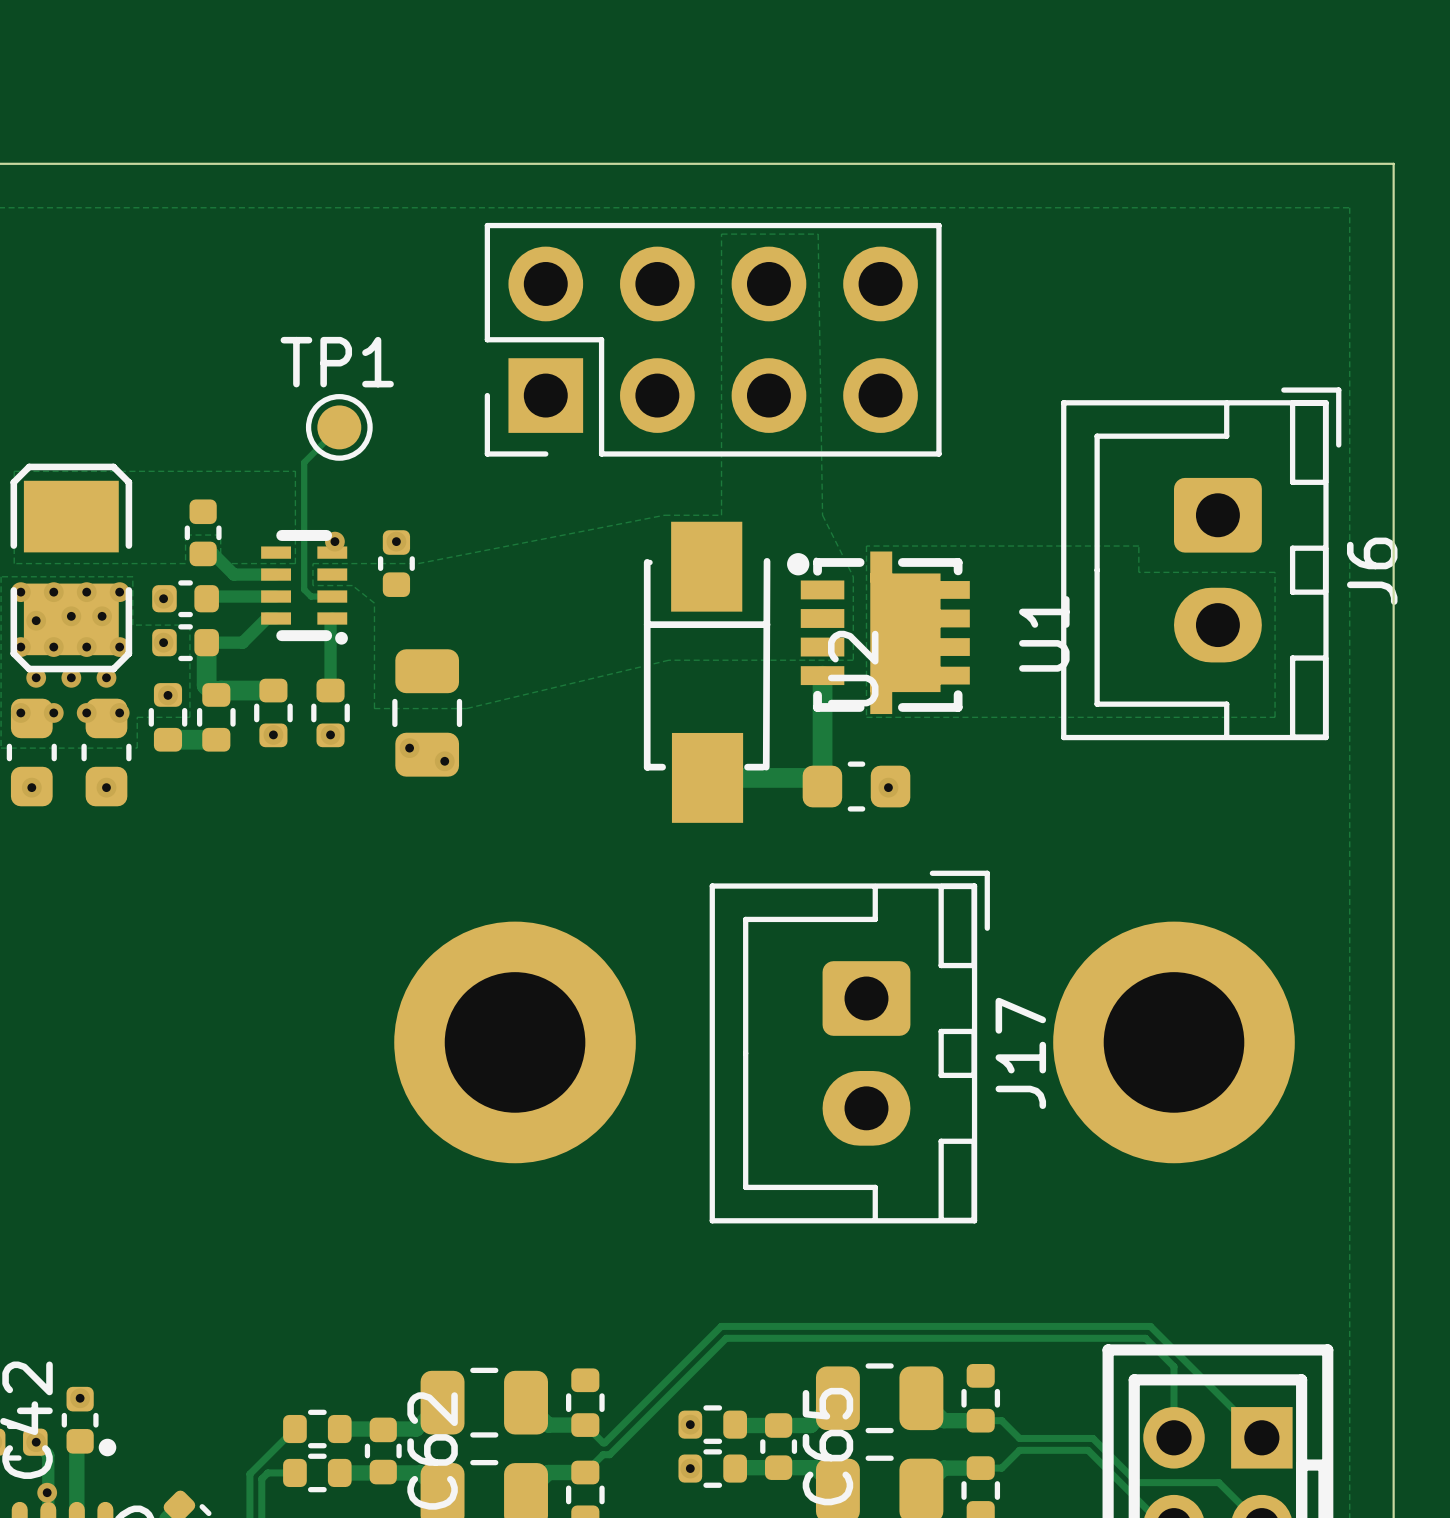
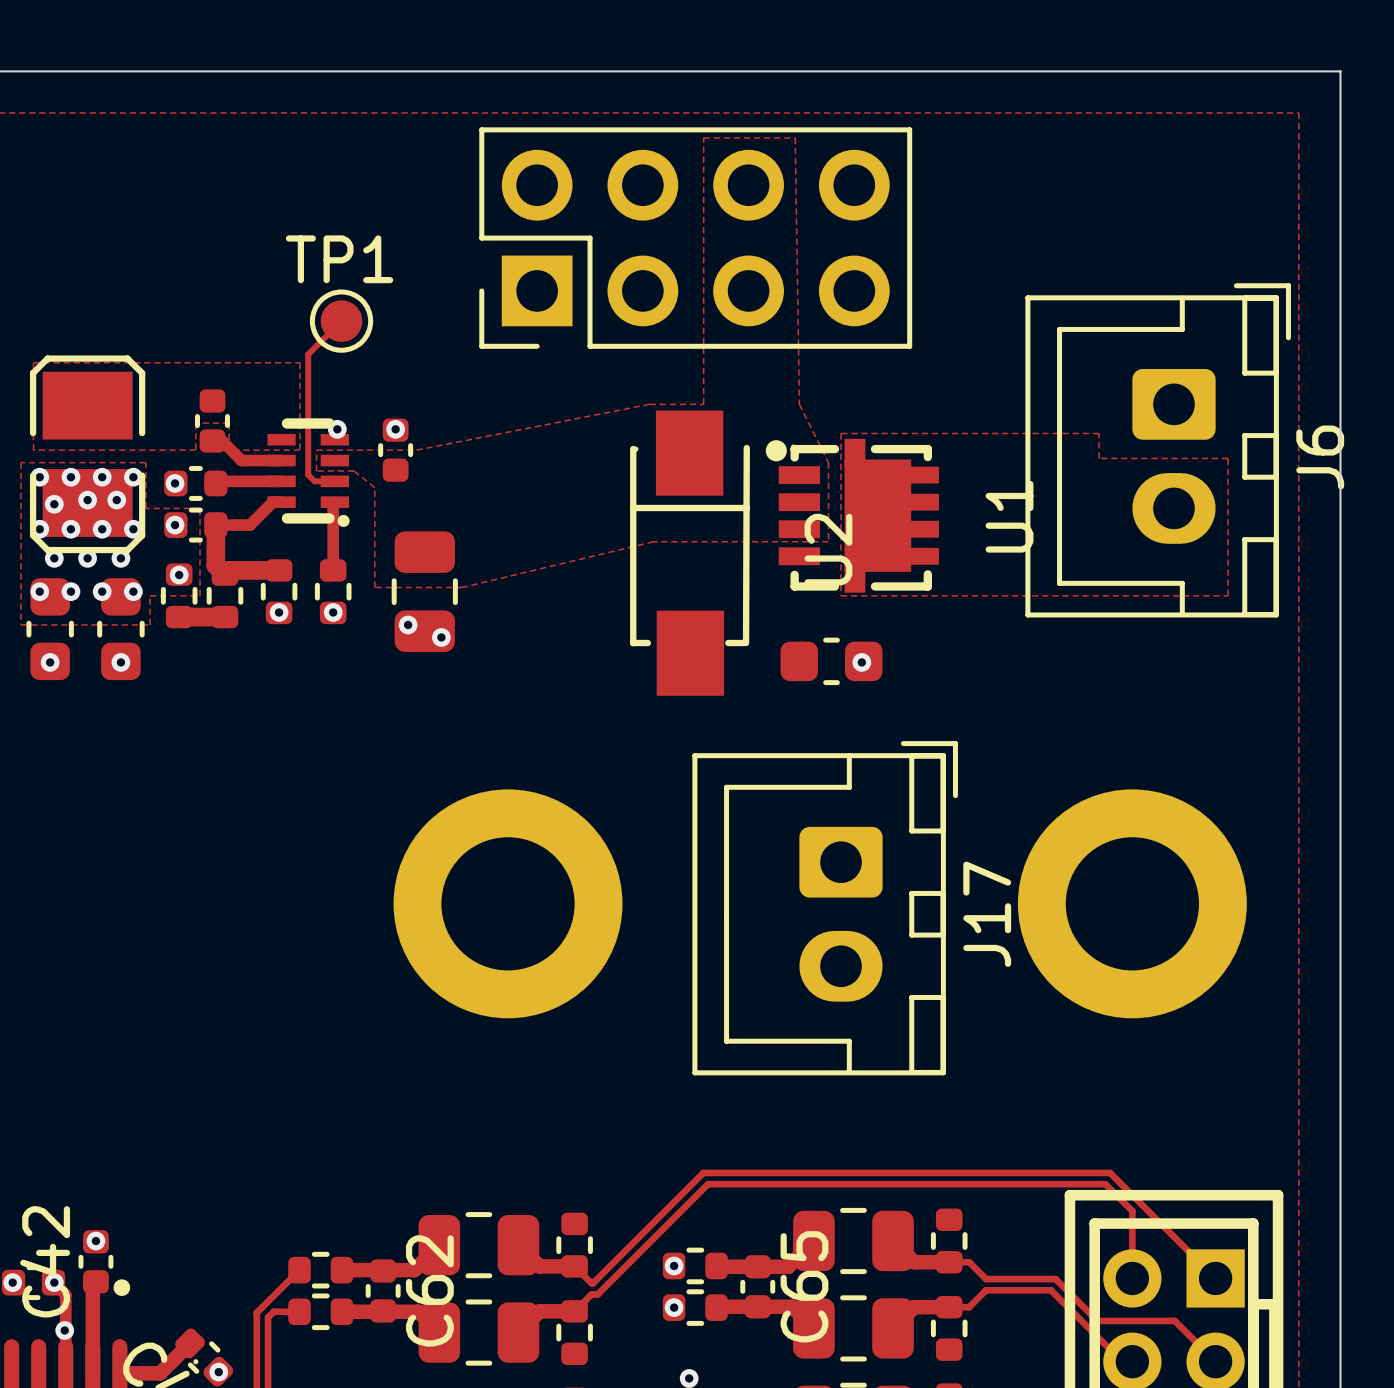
track: (822, 675) (822, 786) (813, 777) (707, 777) -> none

